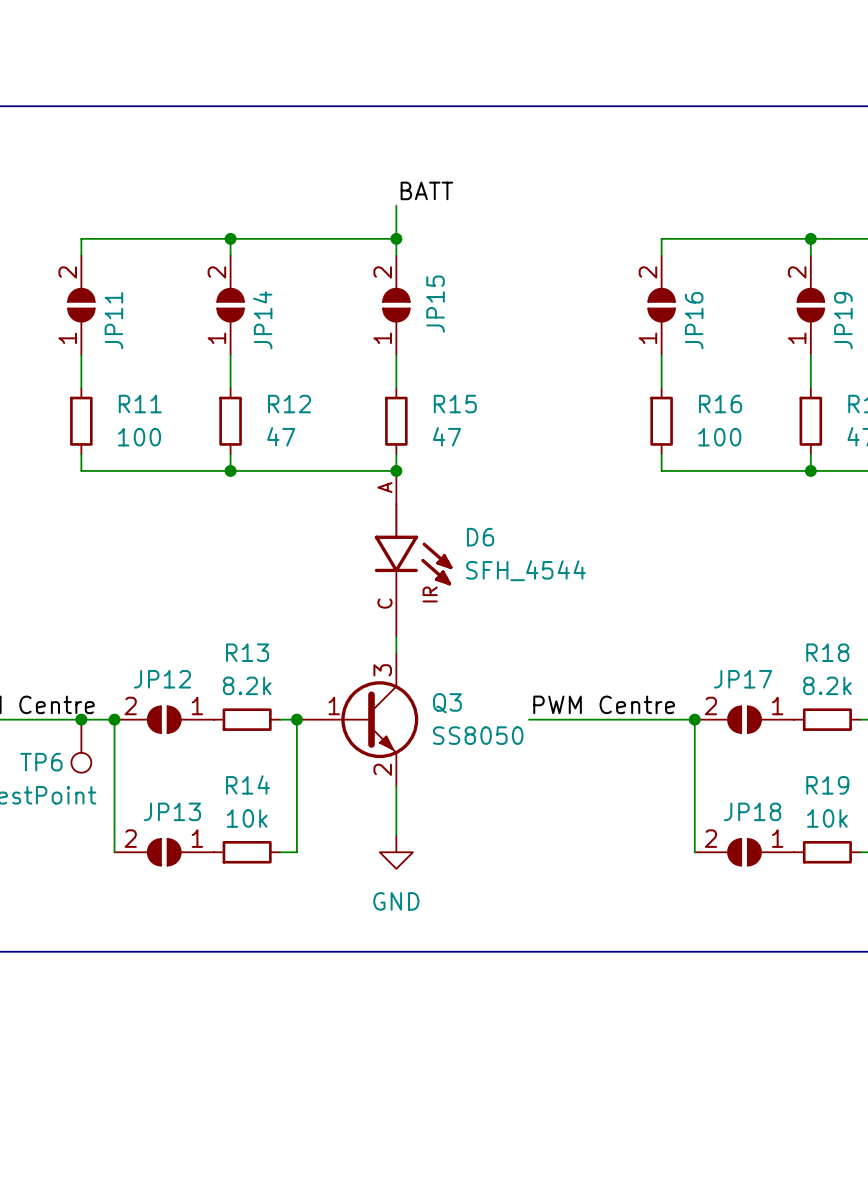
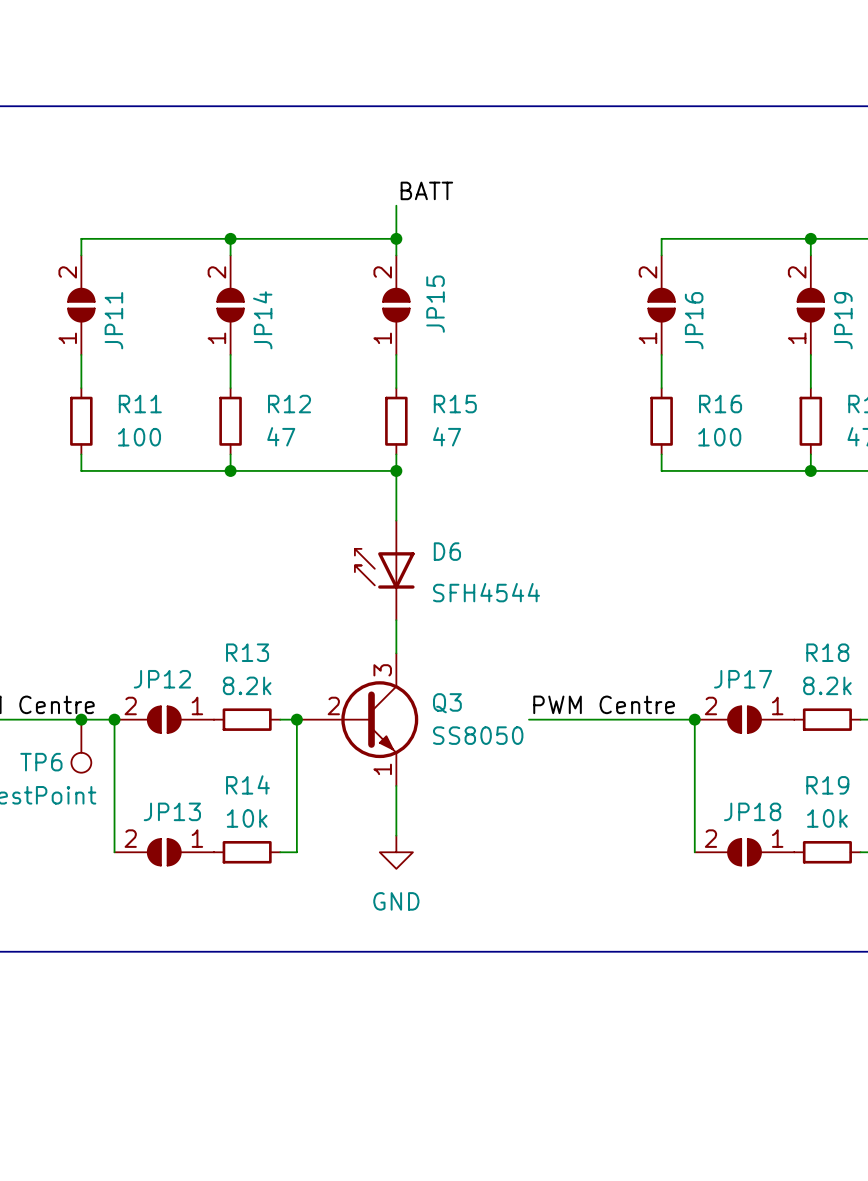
D6 symbol: [374, 470, 453, 637] -> [354, 520, 415, 621]
D6 value: SFH_4544 (525, 570) -> SFH4544 (486, 592)
Q3 pin number: 1 (334, 705) -> 2 (333, 705)
Q3 pin number: 2 (382, 769) -> 1 (382, 769)

